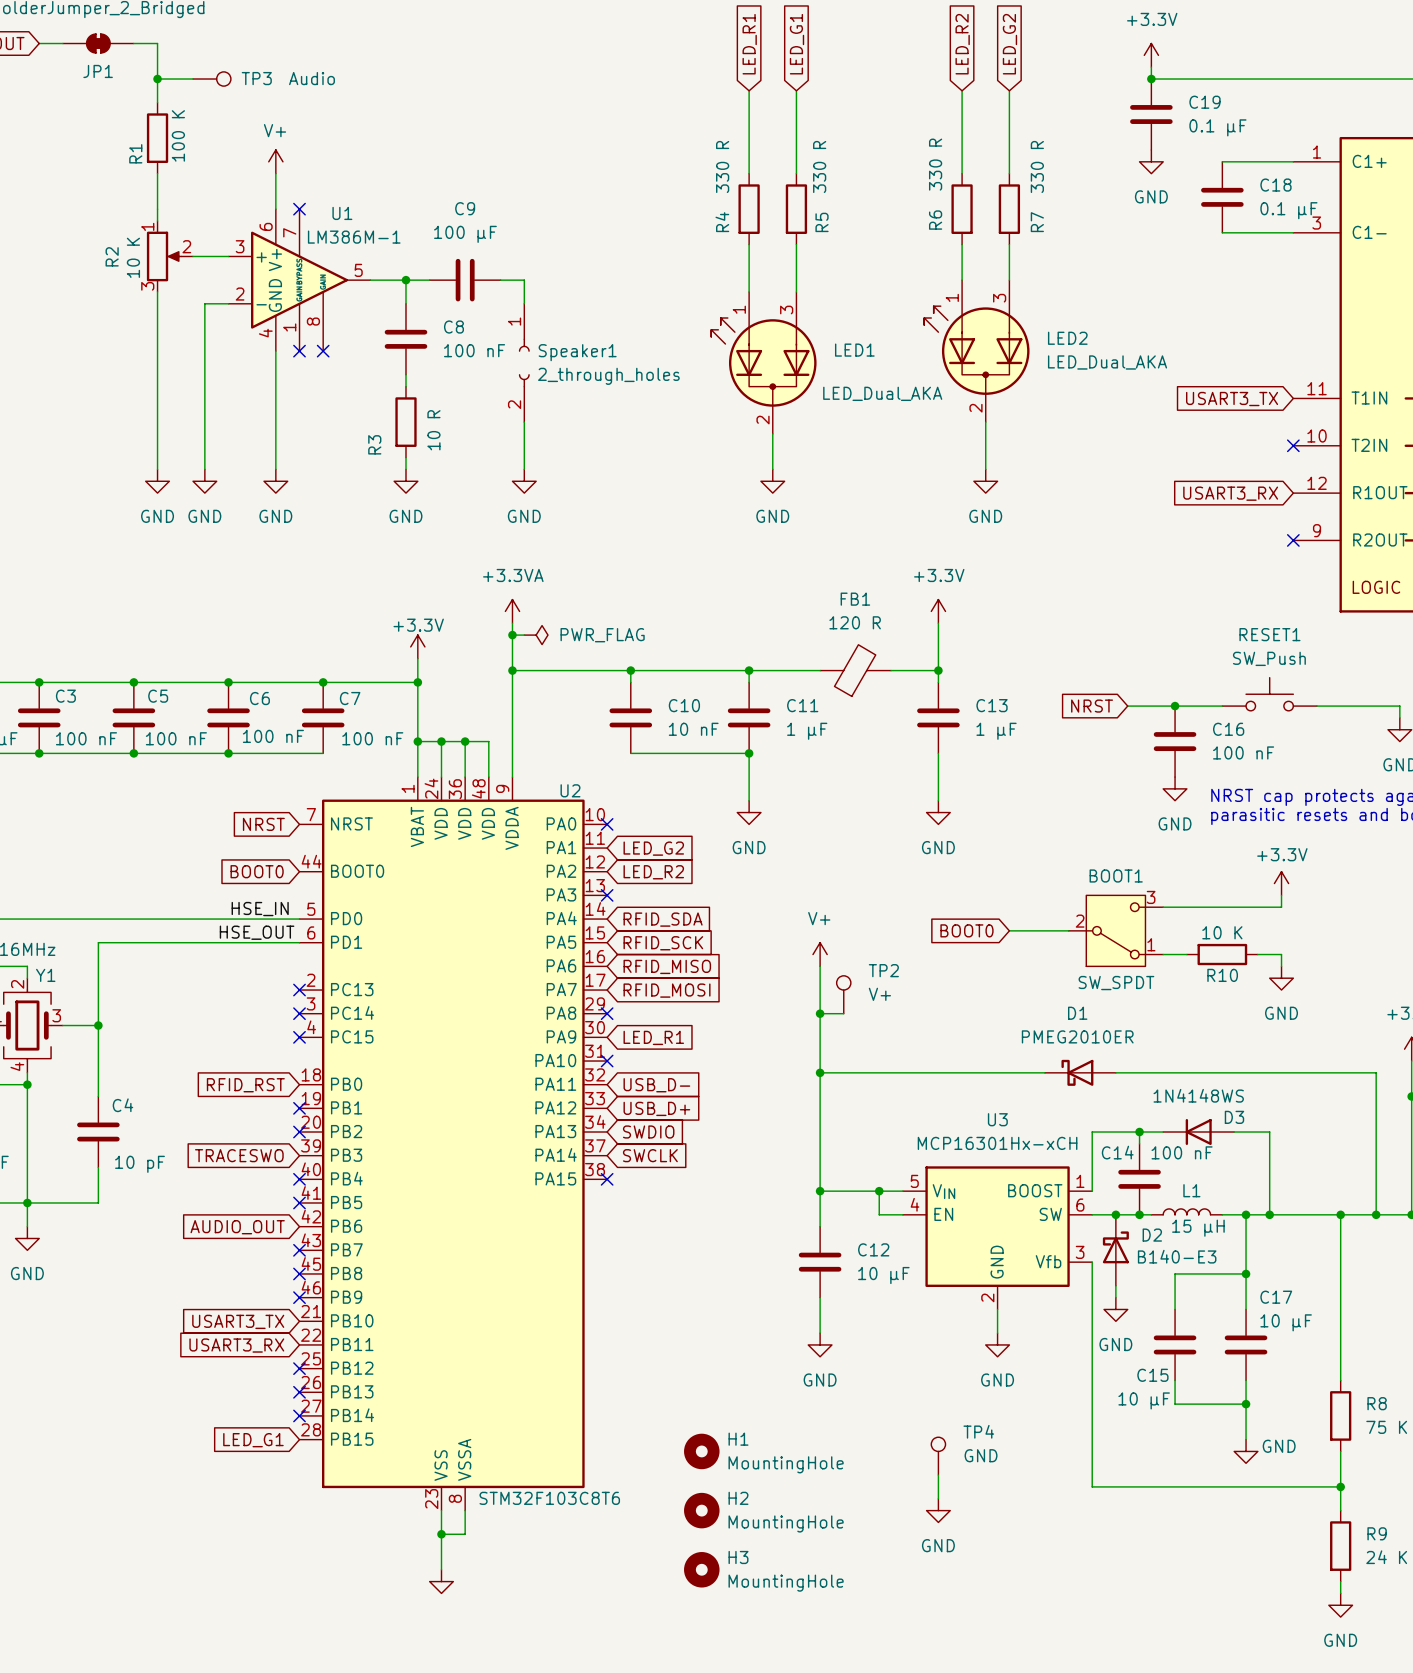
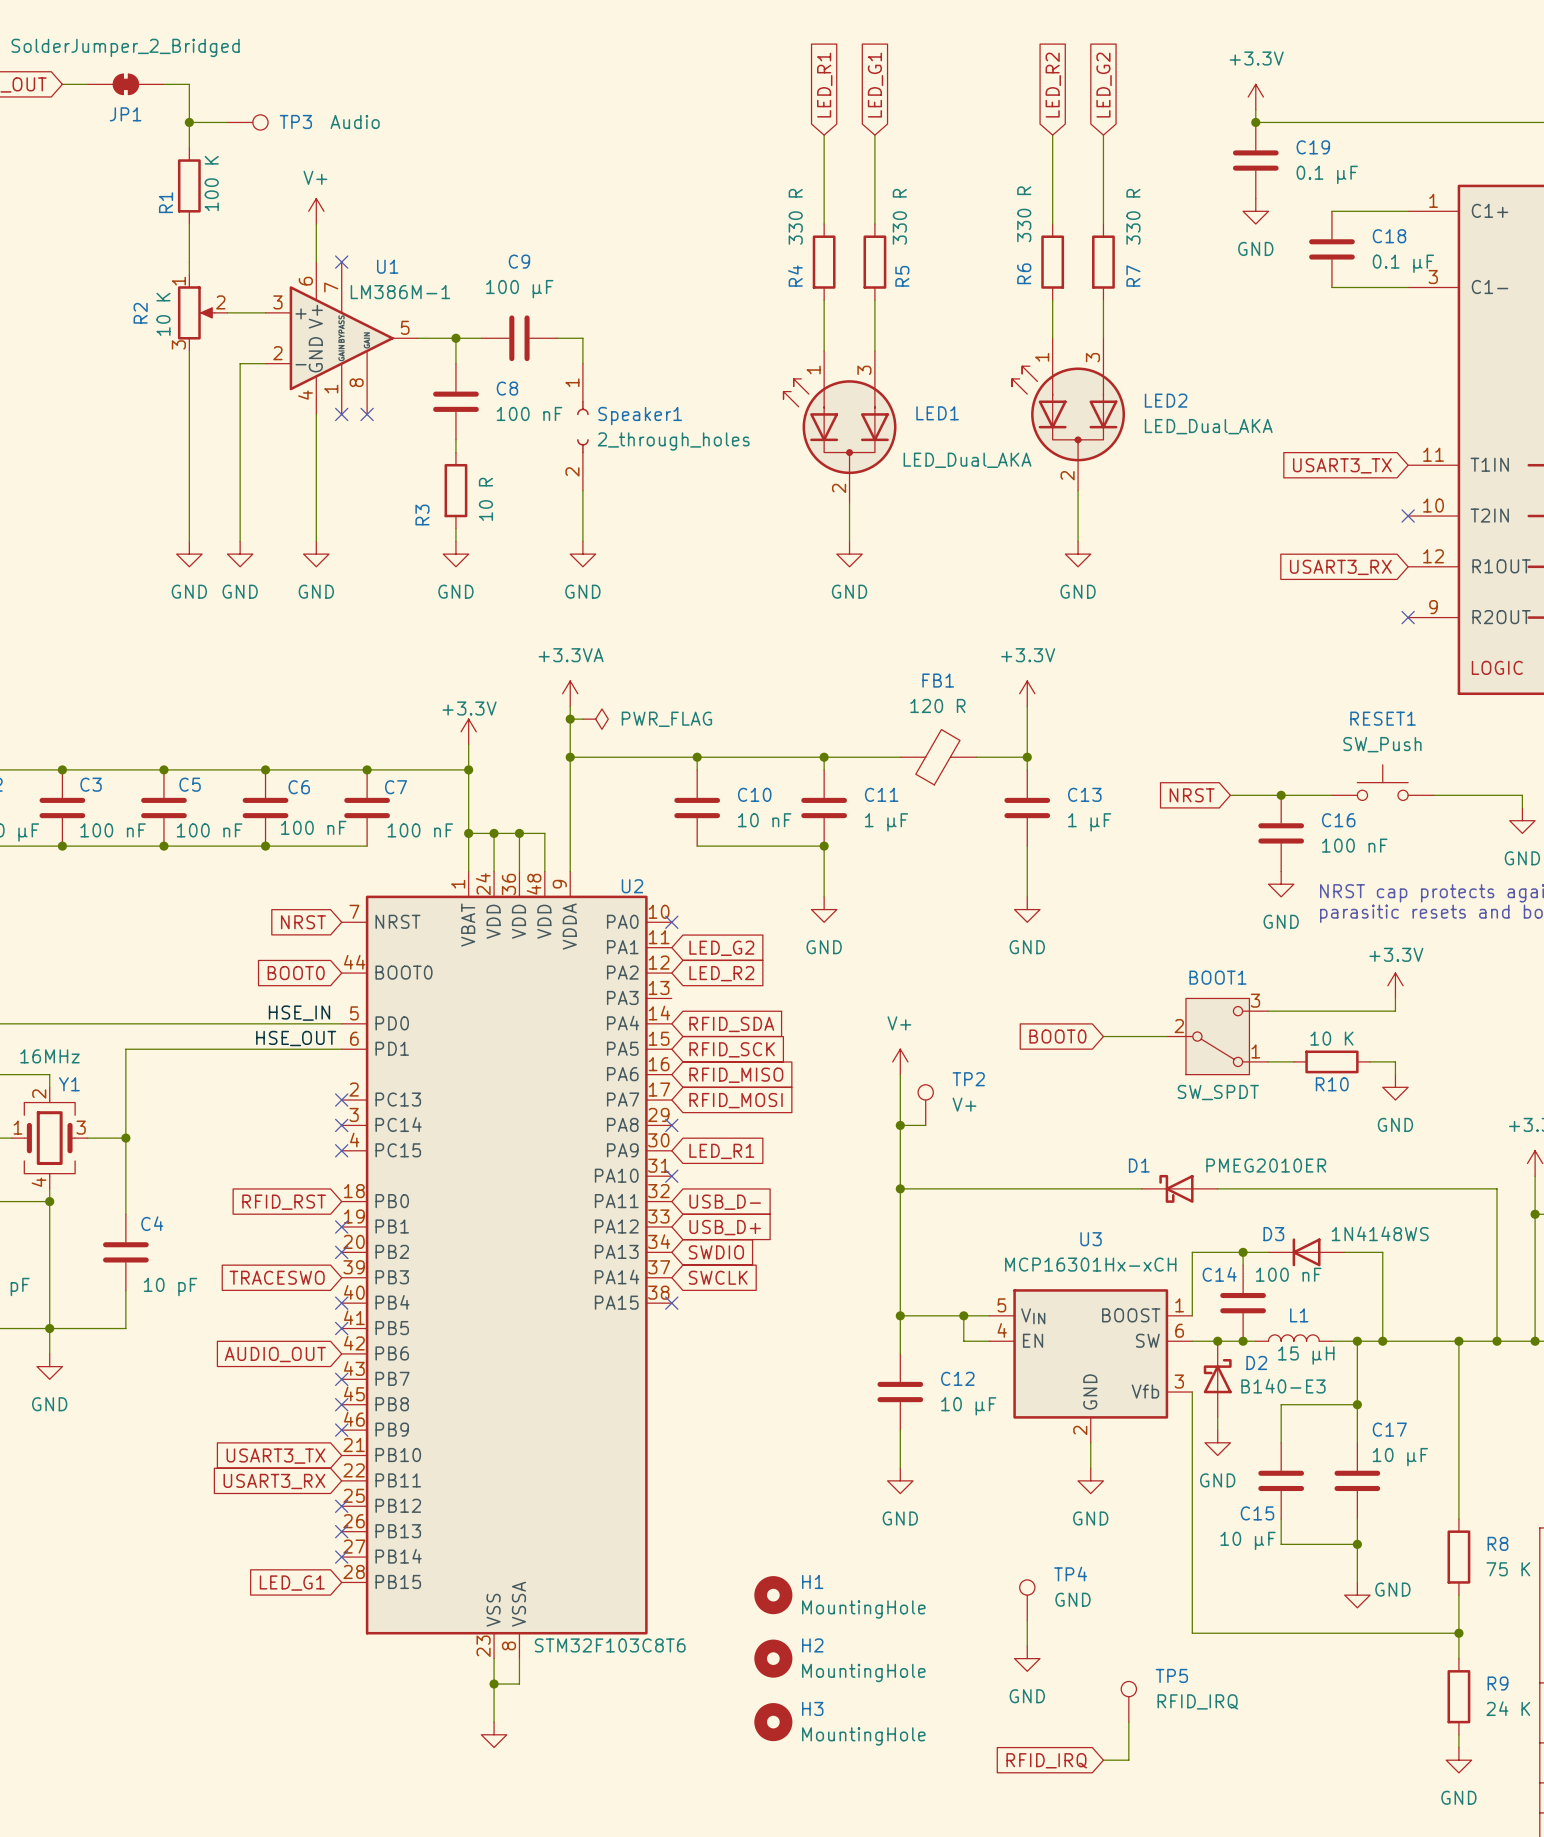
no-connect mark: (607, 895) -> none
D1 name position: D1 (1077, 1013) -> D1 (1139, 1165)
D1 value position: PMEG2010ER (1077, 1036) -> PMEG2010ER (1266, 1165)
D3 value position: 1N4148WS (1198, 1095) -> 1N4148WS (1380, 1233)
D3 name position: D3 (1234, 1117) -> D3 (1273, 1234)
TP5: none -> RFID_IRQ (1128, 1701)
wire: none -> (1128, 1722) (1128, 1760) (1103, 1760)
global label: none -> RFID_IRQ (1046, 1760)

